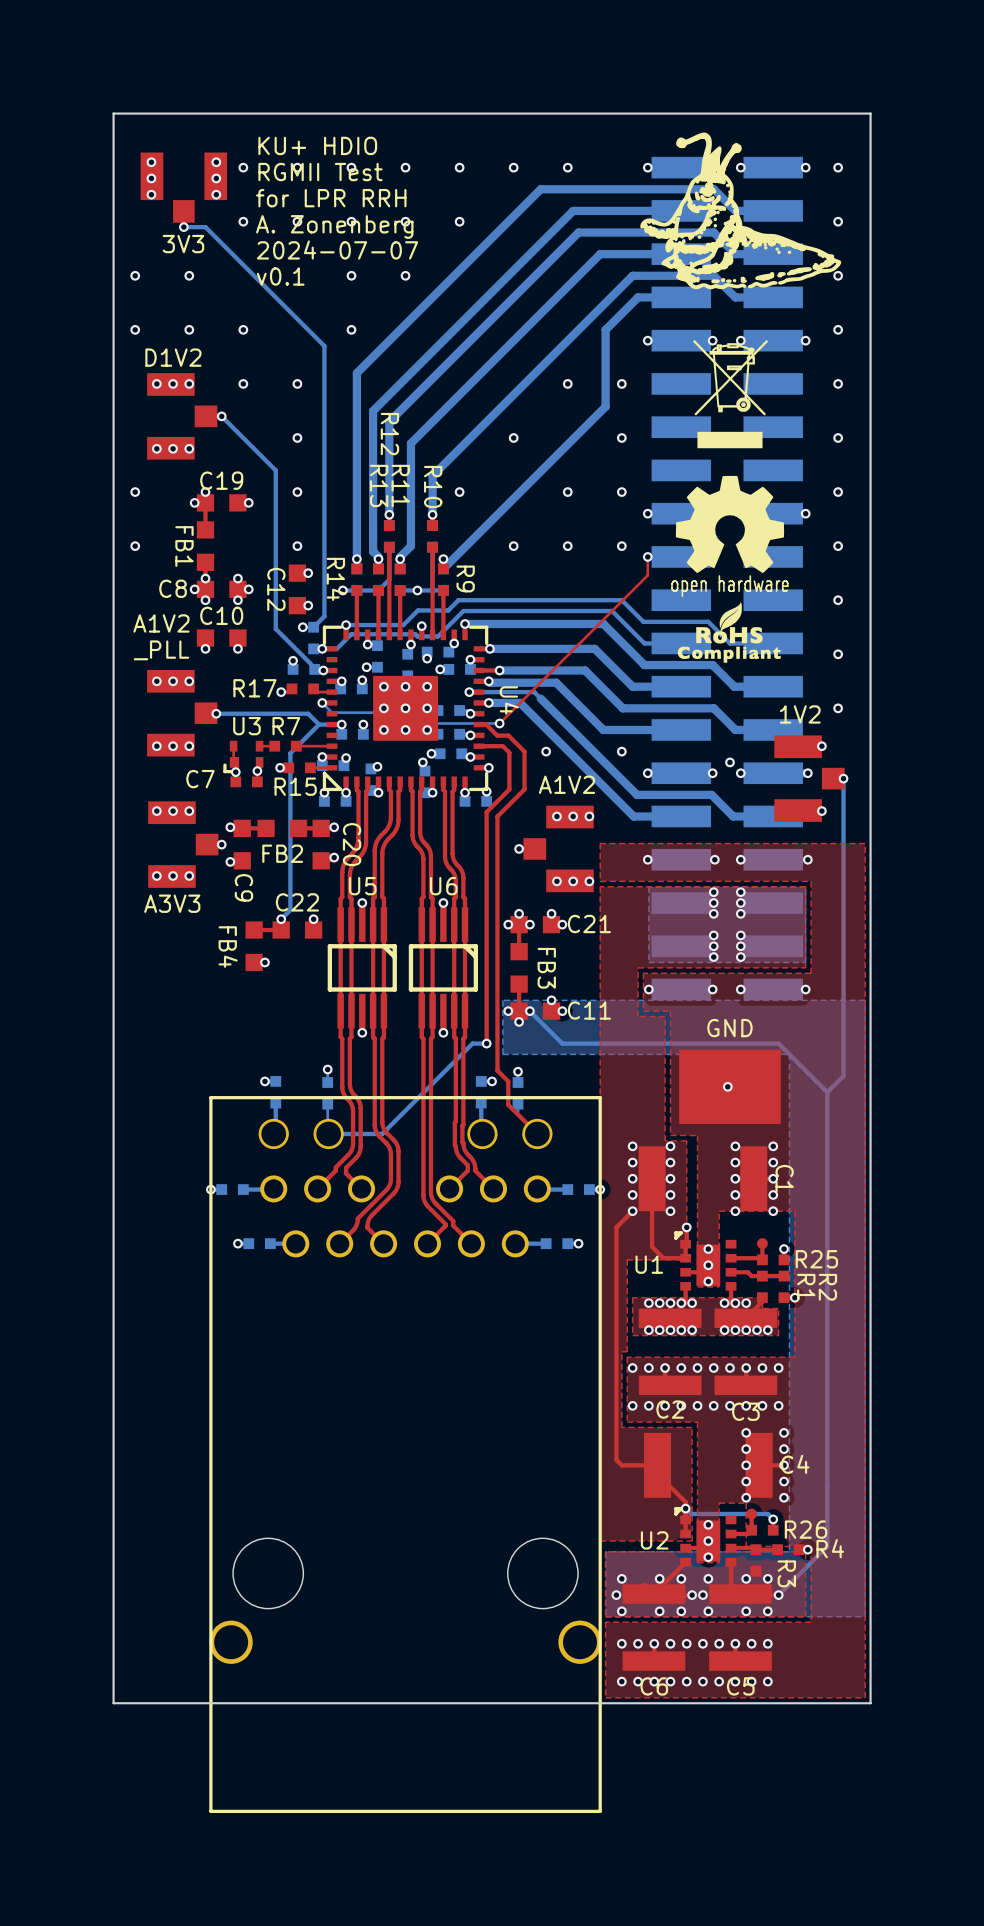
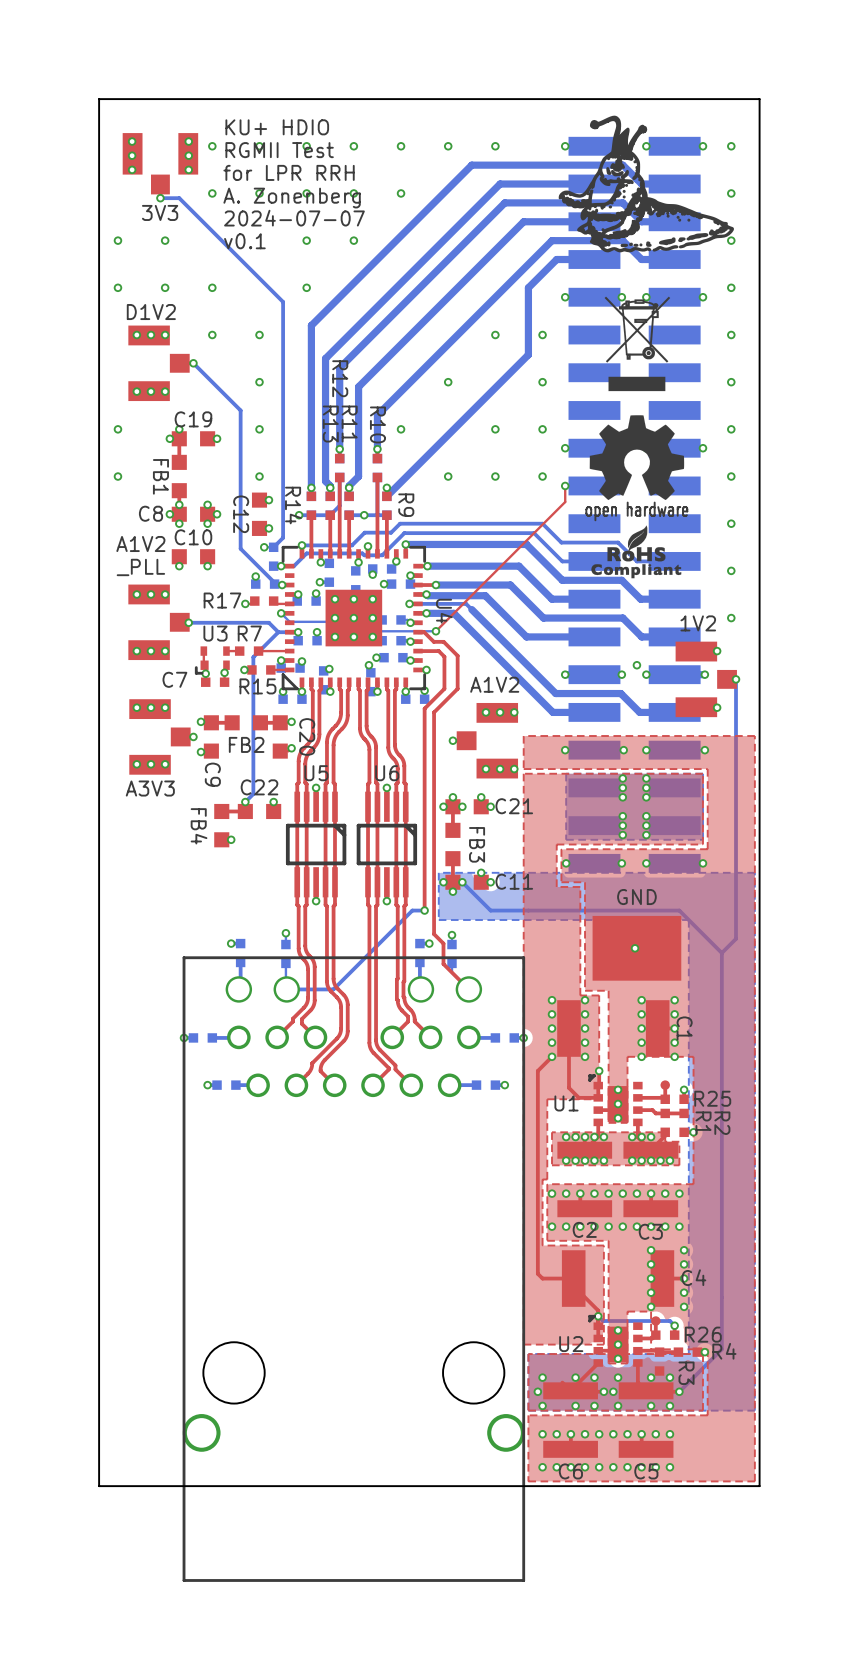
via: (546, 751) -> none
via: (621, 751) -> none

